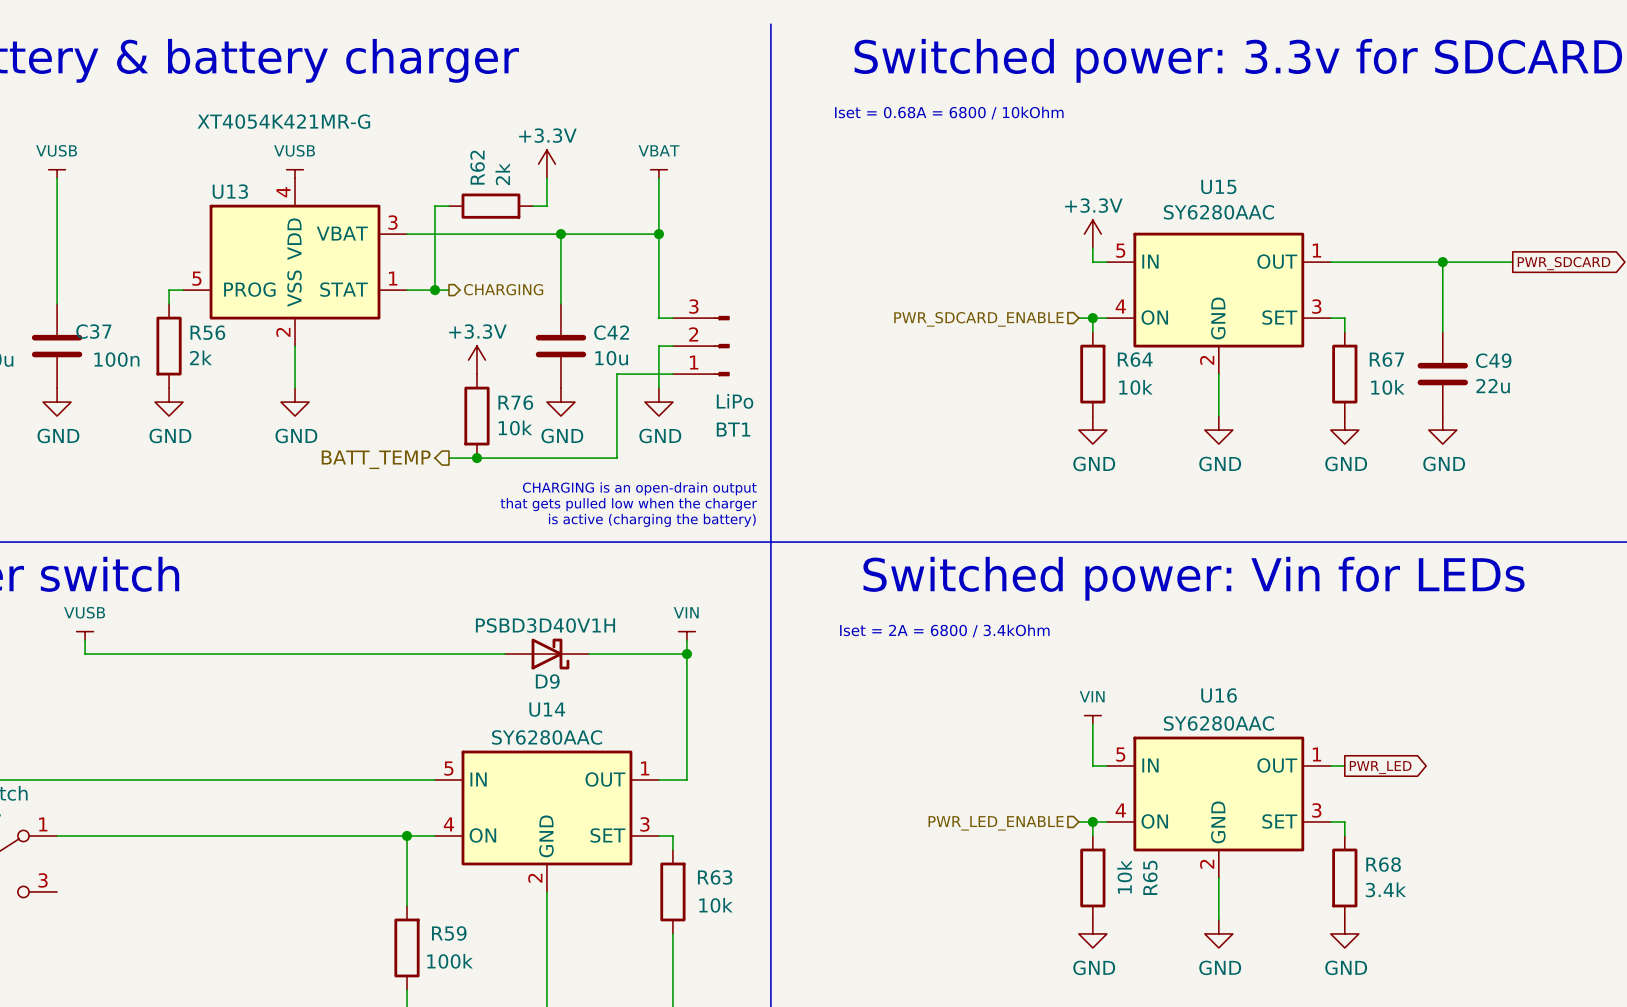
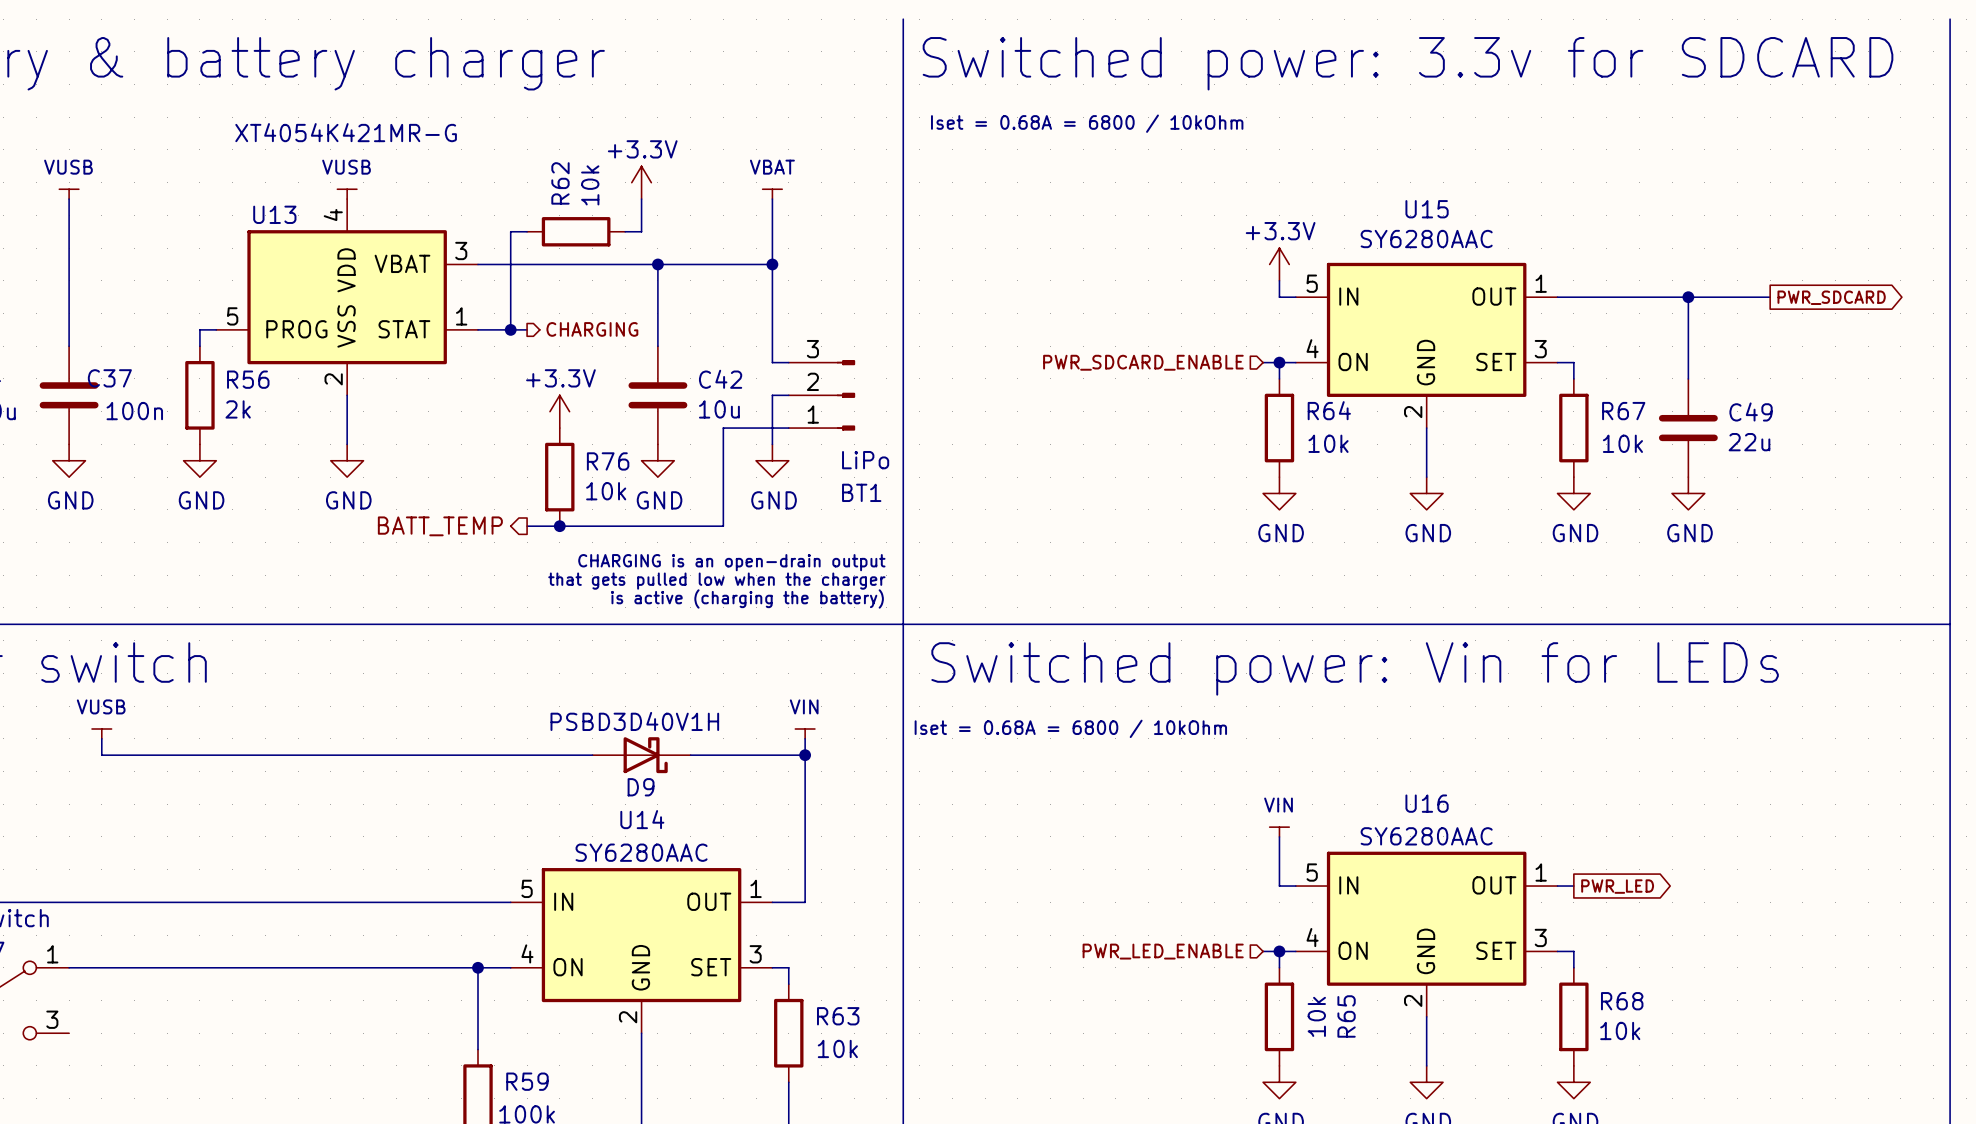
R62 value: 2k (502, 174) -> 10k (590, 185)
text: Iset = 2A = 6800 / 3.4kOhm (944, 630) -> Iset = 0.68A = 6800 / 10kOhm (1070, 728)
R68 value: 3.4k (1385, 889) -> 10k (1620, 1030)

